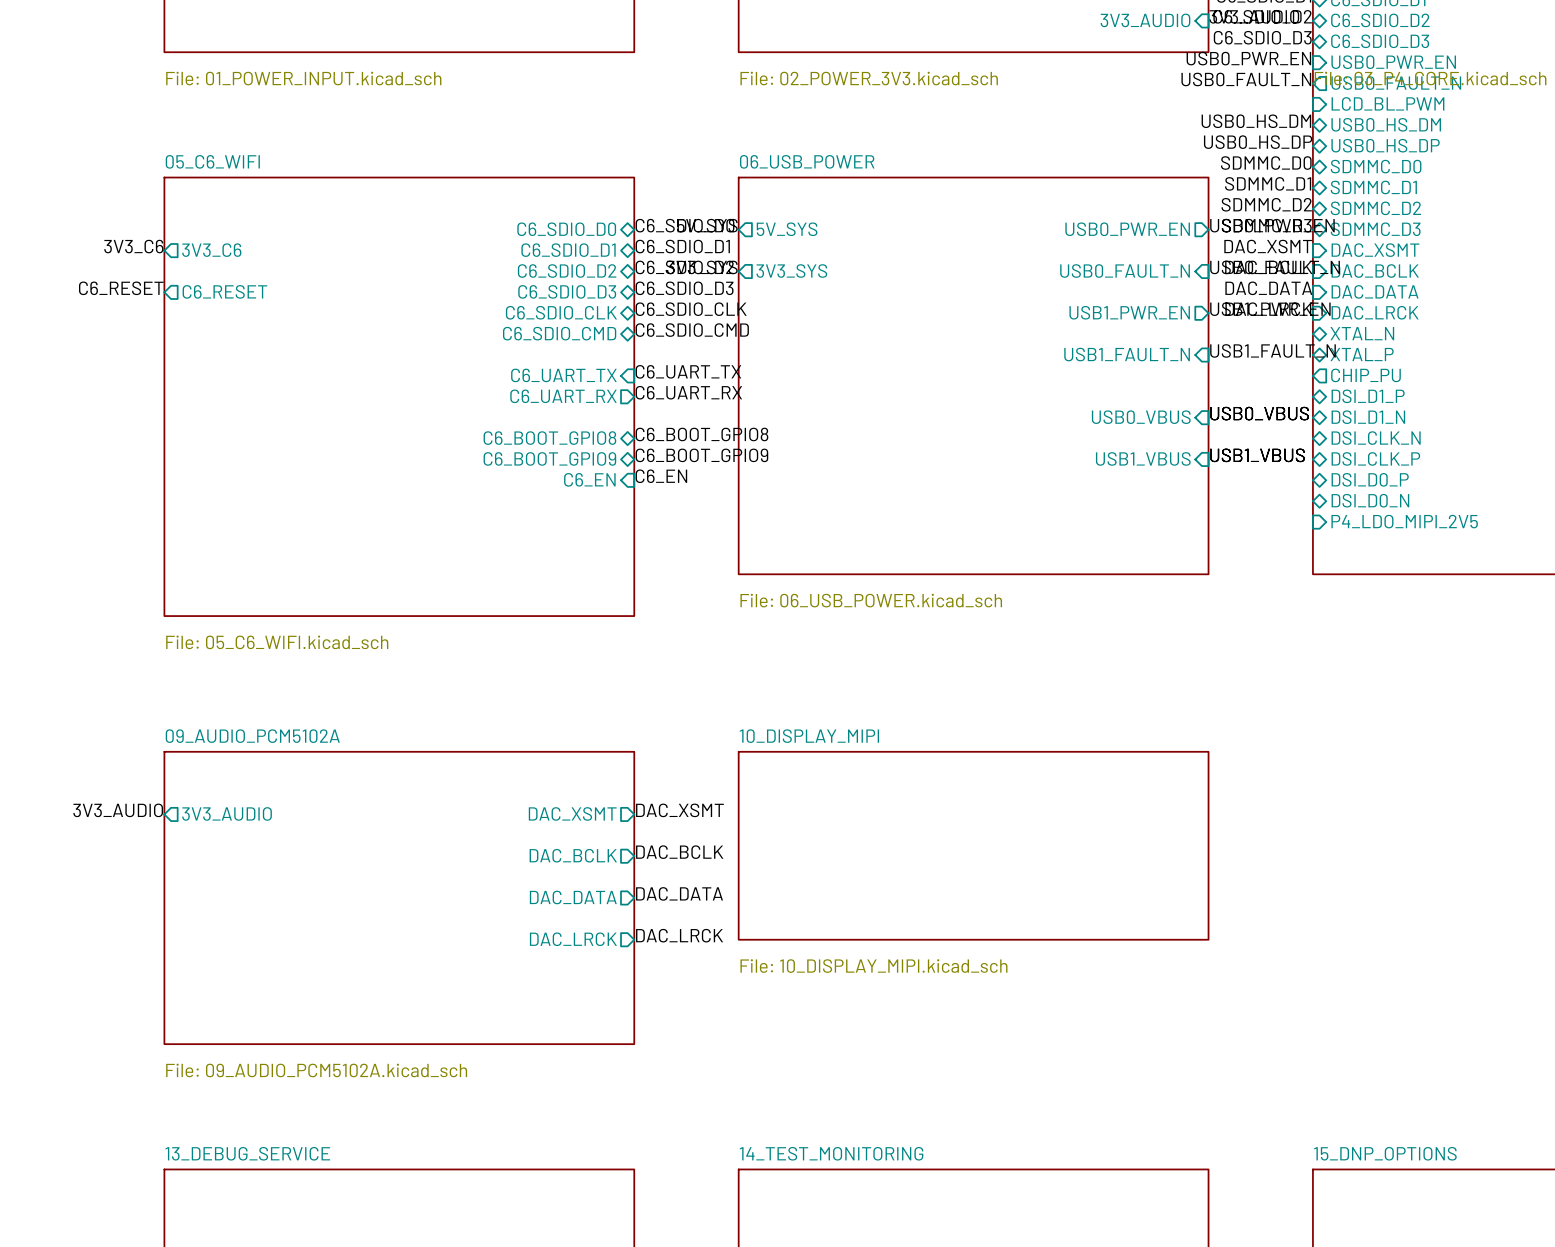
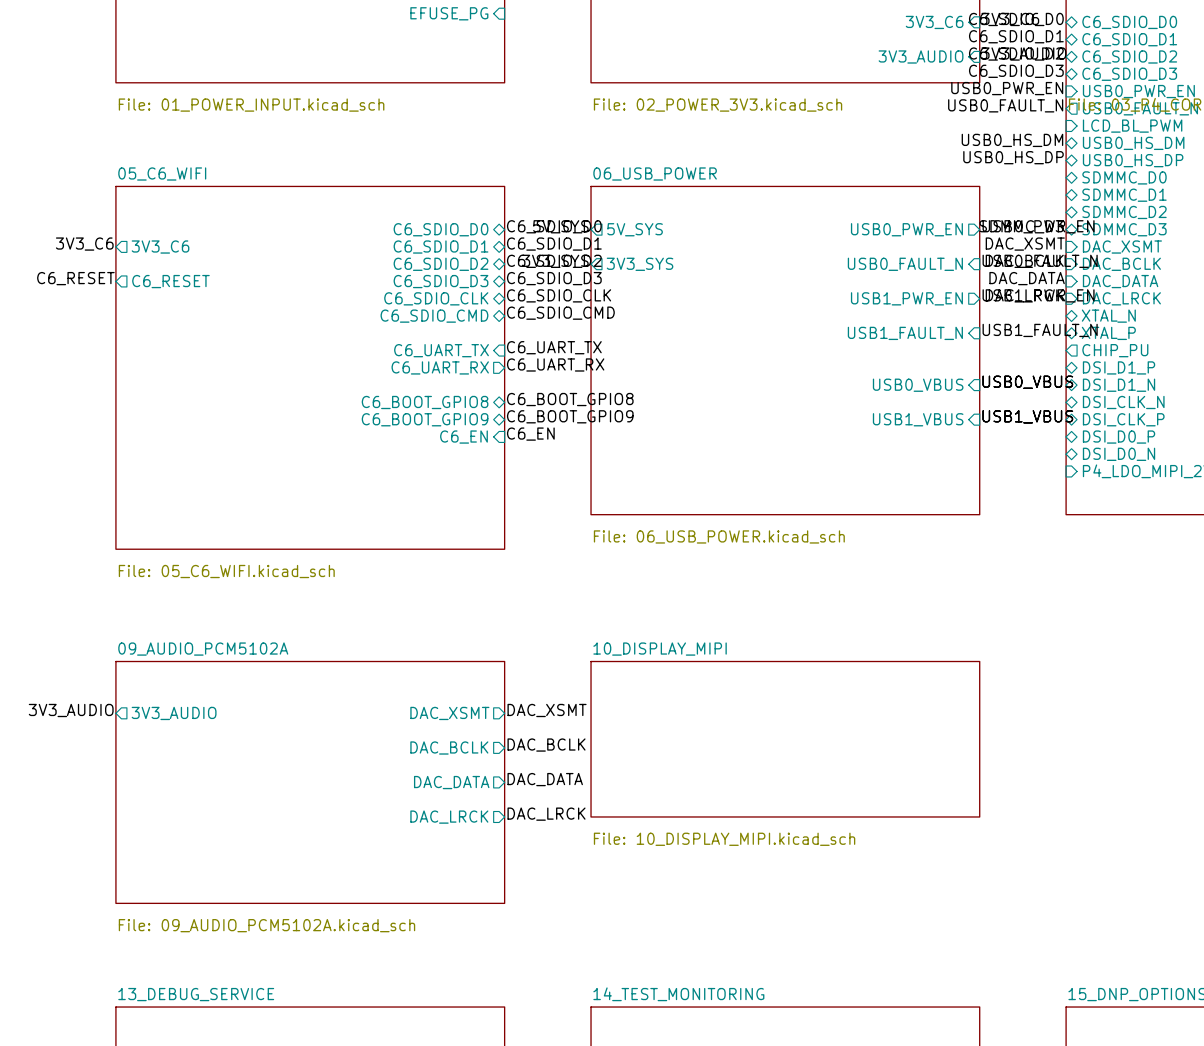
label: SDMMC_D0 (1266, 163) -> none
label: SDMMC_D1 (1268, 183) -> none
label: SDMMC_D2 (1266, 204) -> none

